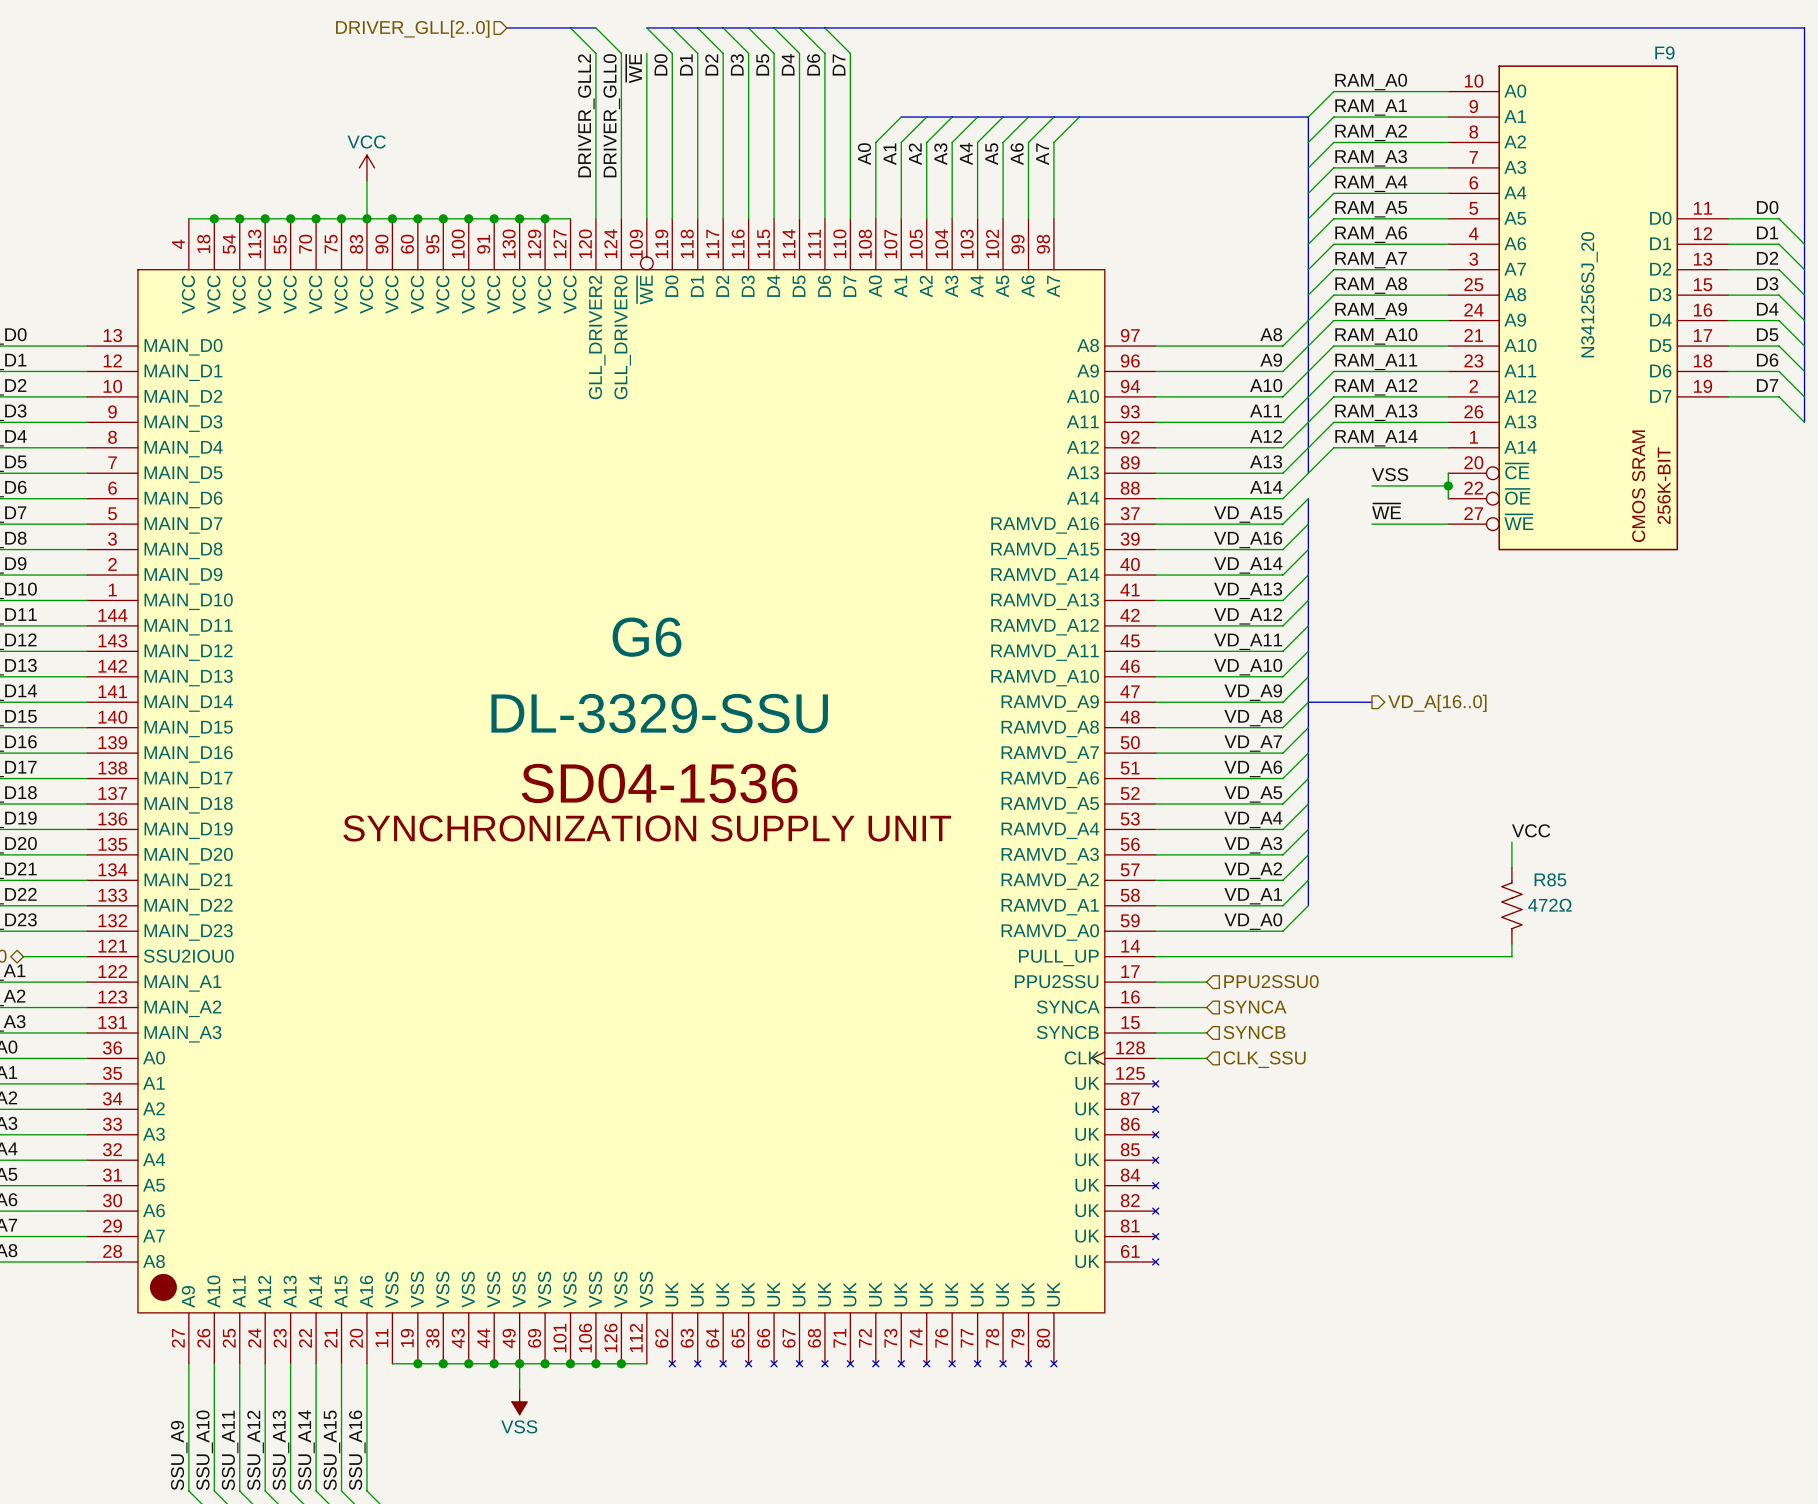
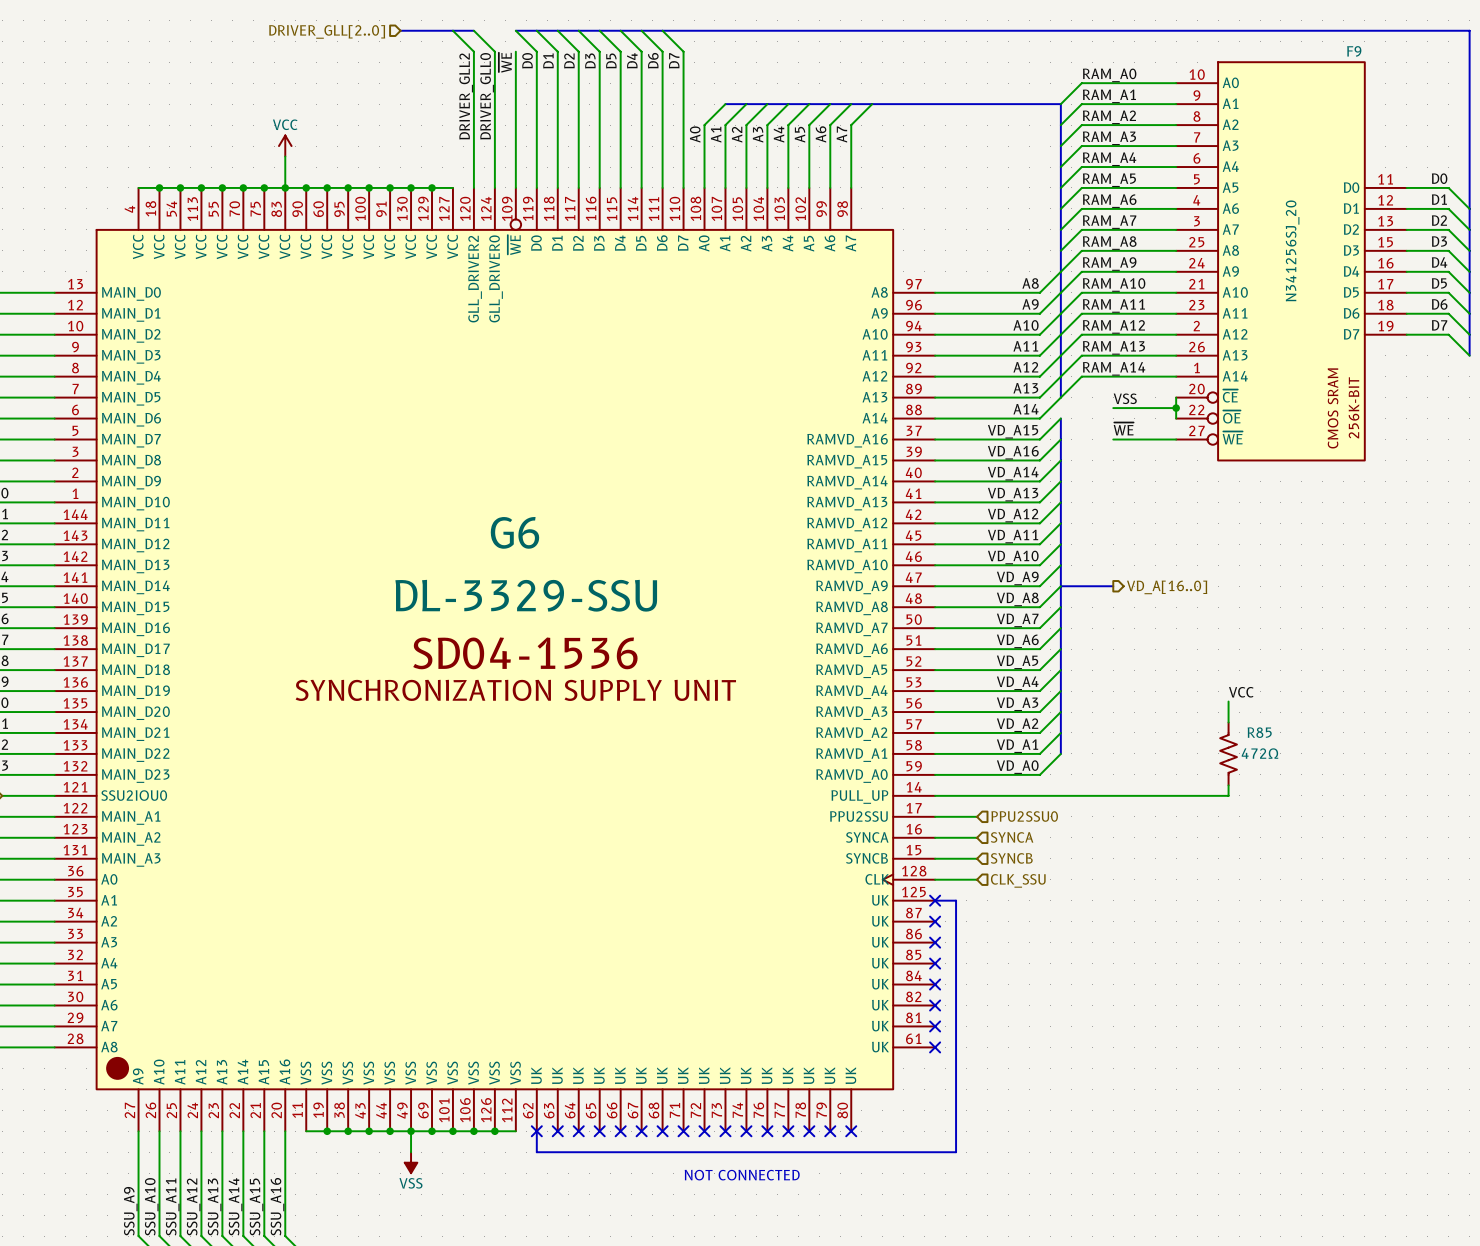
G6 symbol: [87, 218, 1159, 1367] -> [54, 187, 936, 1132]
line: none -> (935, 900) (956, 900) (956, 1152) (536, 1152) (536, 1131)
no-connect mark: none -> (935, 900)
no-connect mark: none -> (935, 921)
no-connect mark: none -> (935, 942)
no-connect mark: none -> (935, 963)
no-connect mark: none -> (935, 984)
no-connect mark: none -> (935, 1005)
no-connect mark: none -> (935, 1026)
no-connect mark: none -> (935, 1047)
no-connect mark: none -> (536, 1131)
no-connect mark: none -> (557, 1131)
no-connect mark: none -> (578, 1131)
no-connect mark: none -> (599, 1131)
no-connect mark: none -> (620, 1131)
no-connect mark: none -> (641, 1131)
no-connect mark: none -> (662, 1131)
no-connect mark: none -> (683, 1131)
no-connect mark: none -> (704, 1131)
no-connect mark: none -> (725, 1131)
no-connect mark: none -> (746, 1131)
no-connect mark: none -> (767, 1131)
no-connect mark: none -> (788, 1131)
no-connect mark: none -> (809, 1131)
no-connect mark: none -> (830, 1131)
no-connect mark: none -> (851, 1131)
text: none -> NOT CONNECTED (742, 1175)

